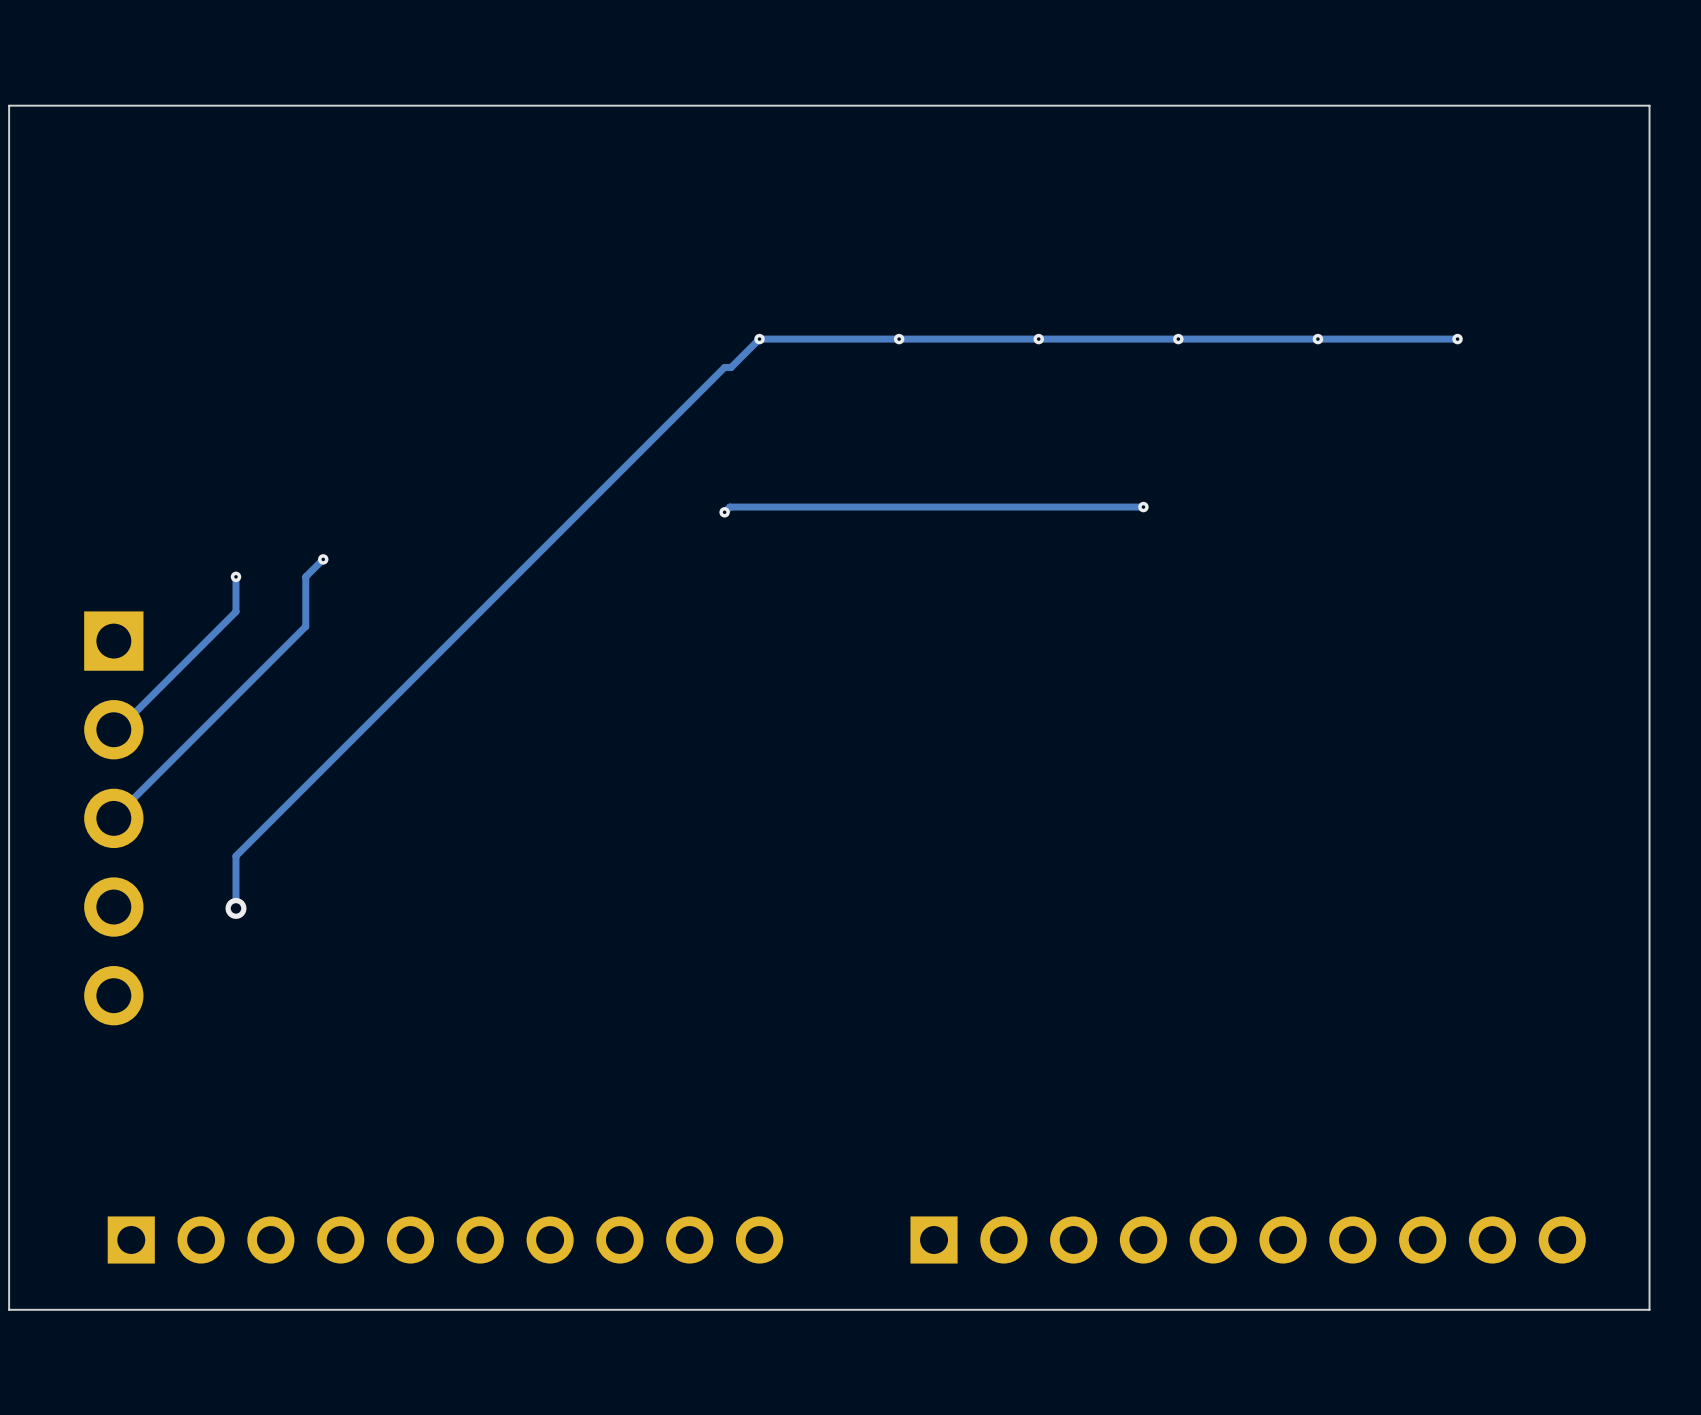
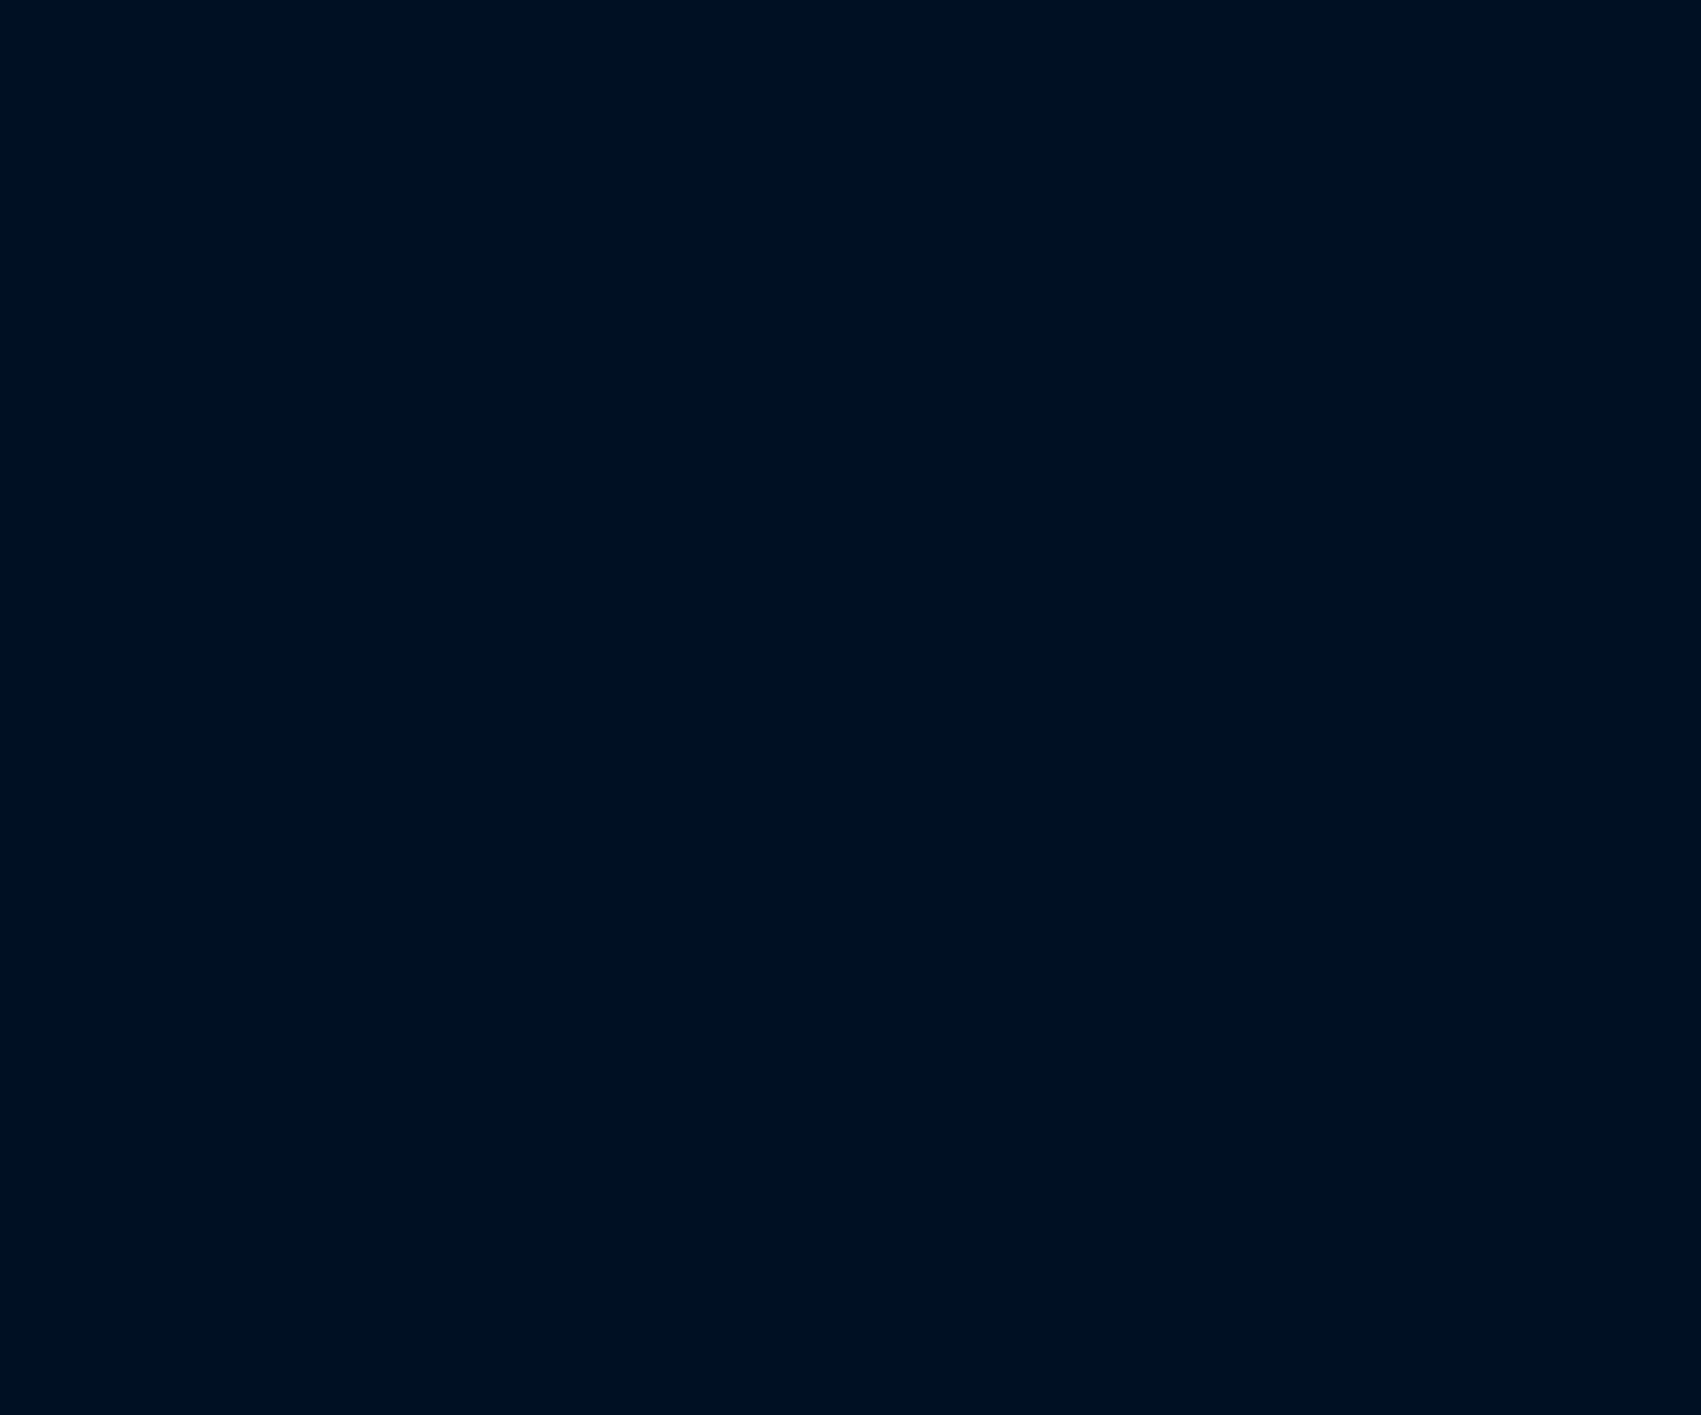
board edge: (1649, 105) (9, 105) (9, 1309) (1649, 1309) (1649, 105) -> none
via: (759, 339) -> none
via: (899, 339) -> none
via: (1038, 339) -> none
via: (1178, 339) -> none
via: (1317, 339) -> none
track: (1457, 339) (759, 339) (731, 367) (724, 367) (235, 856) (235, 908) -> none
via: (1457, 339) -> none
track: (1143, 507) (729, 507) (724, 512) -> none
via: (1143, 507) -> none
via: (724, 512) -> none
track: (323, 559) (305, 576) (305, 626) (113, 818) -> none
via: (323, 559) -> none
track: (235, 576) (235, 611) (118, 729) (113, 729) -> none
via: (235, 576) -> none
part: (113, 818) -> none
via: (235, 908) -> none
part: (445, 1240) -> none
part: (1248, 1240) -> none

